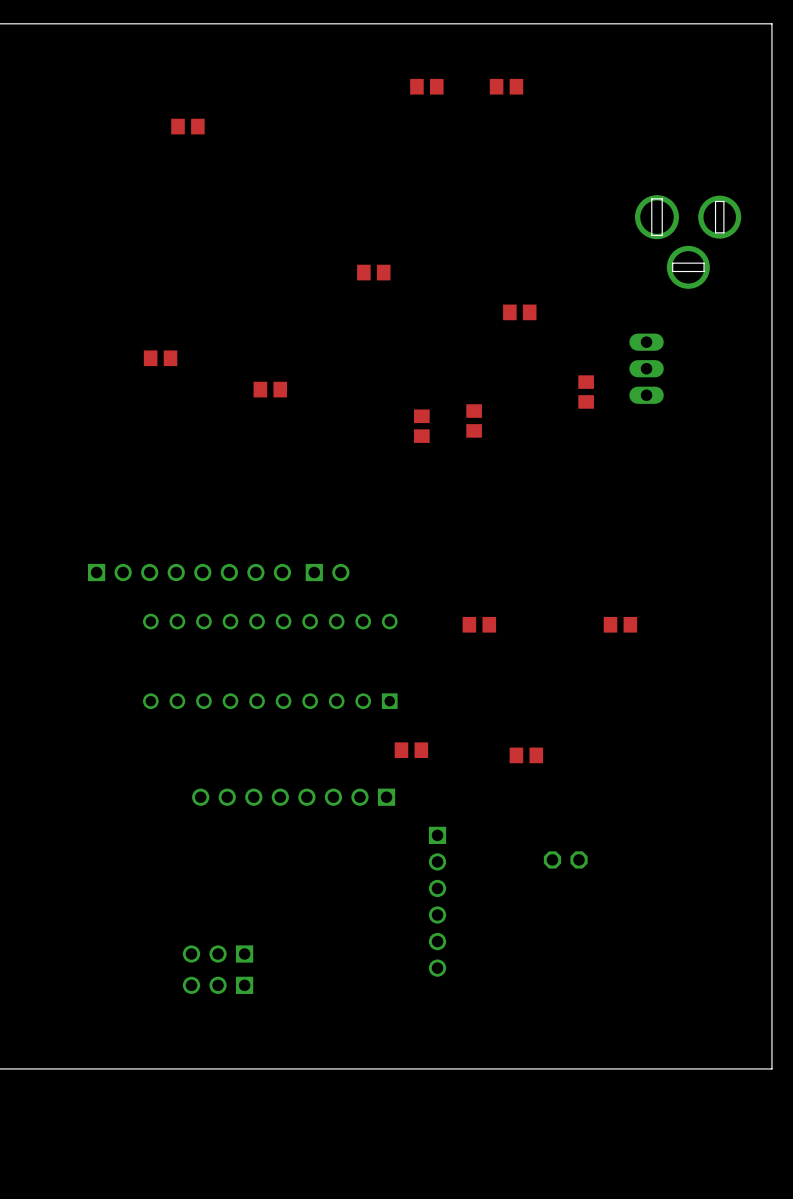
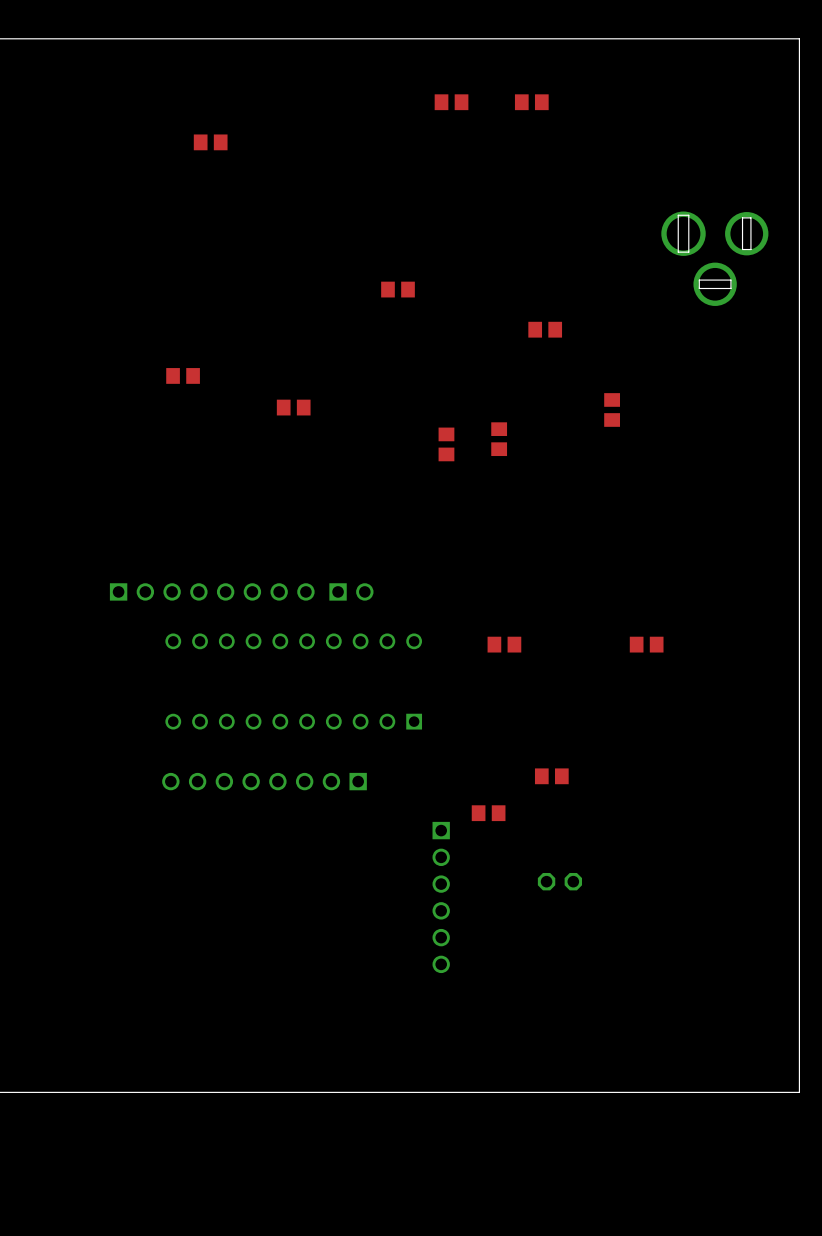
part: (646, 368) -> none
part position: (411, 750) -> (488, 813)
part position: (293, 797) -> (264, 781)
part position: (565, 859) -> (559, 881)
part position: (437, 901) -> (441, 897)
part: (218, 953) -> none
part: (218, 985) -> none

